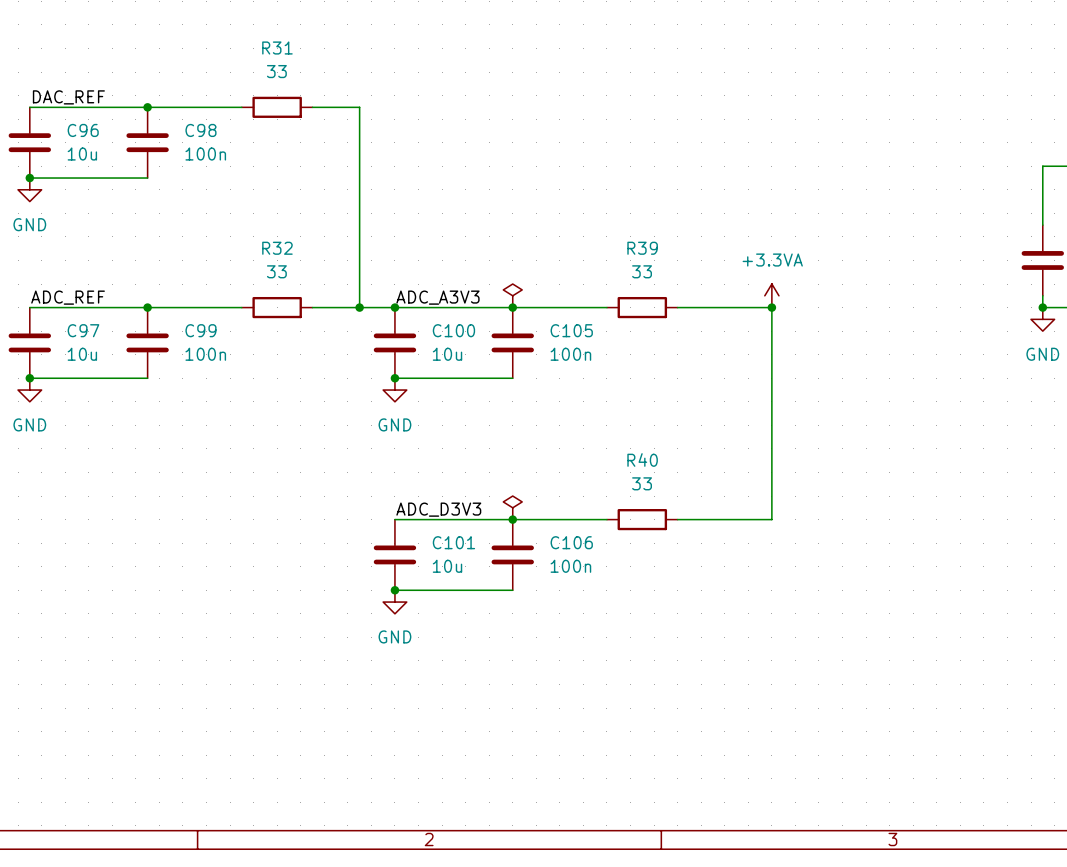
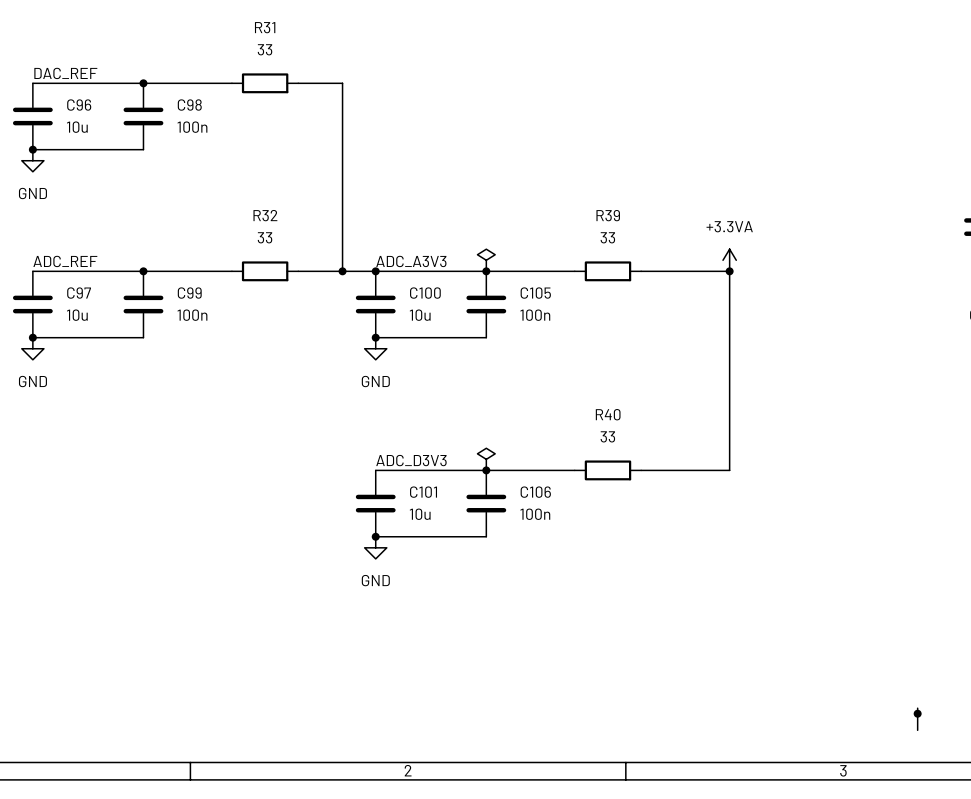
wire: none -> (917, 708) (917, 730)
junction: none -> (917, 713)

